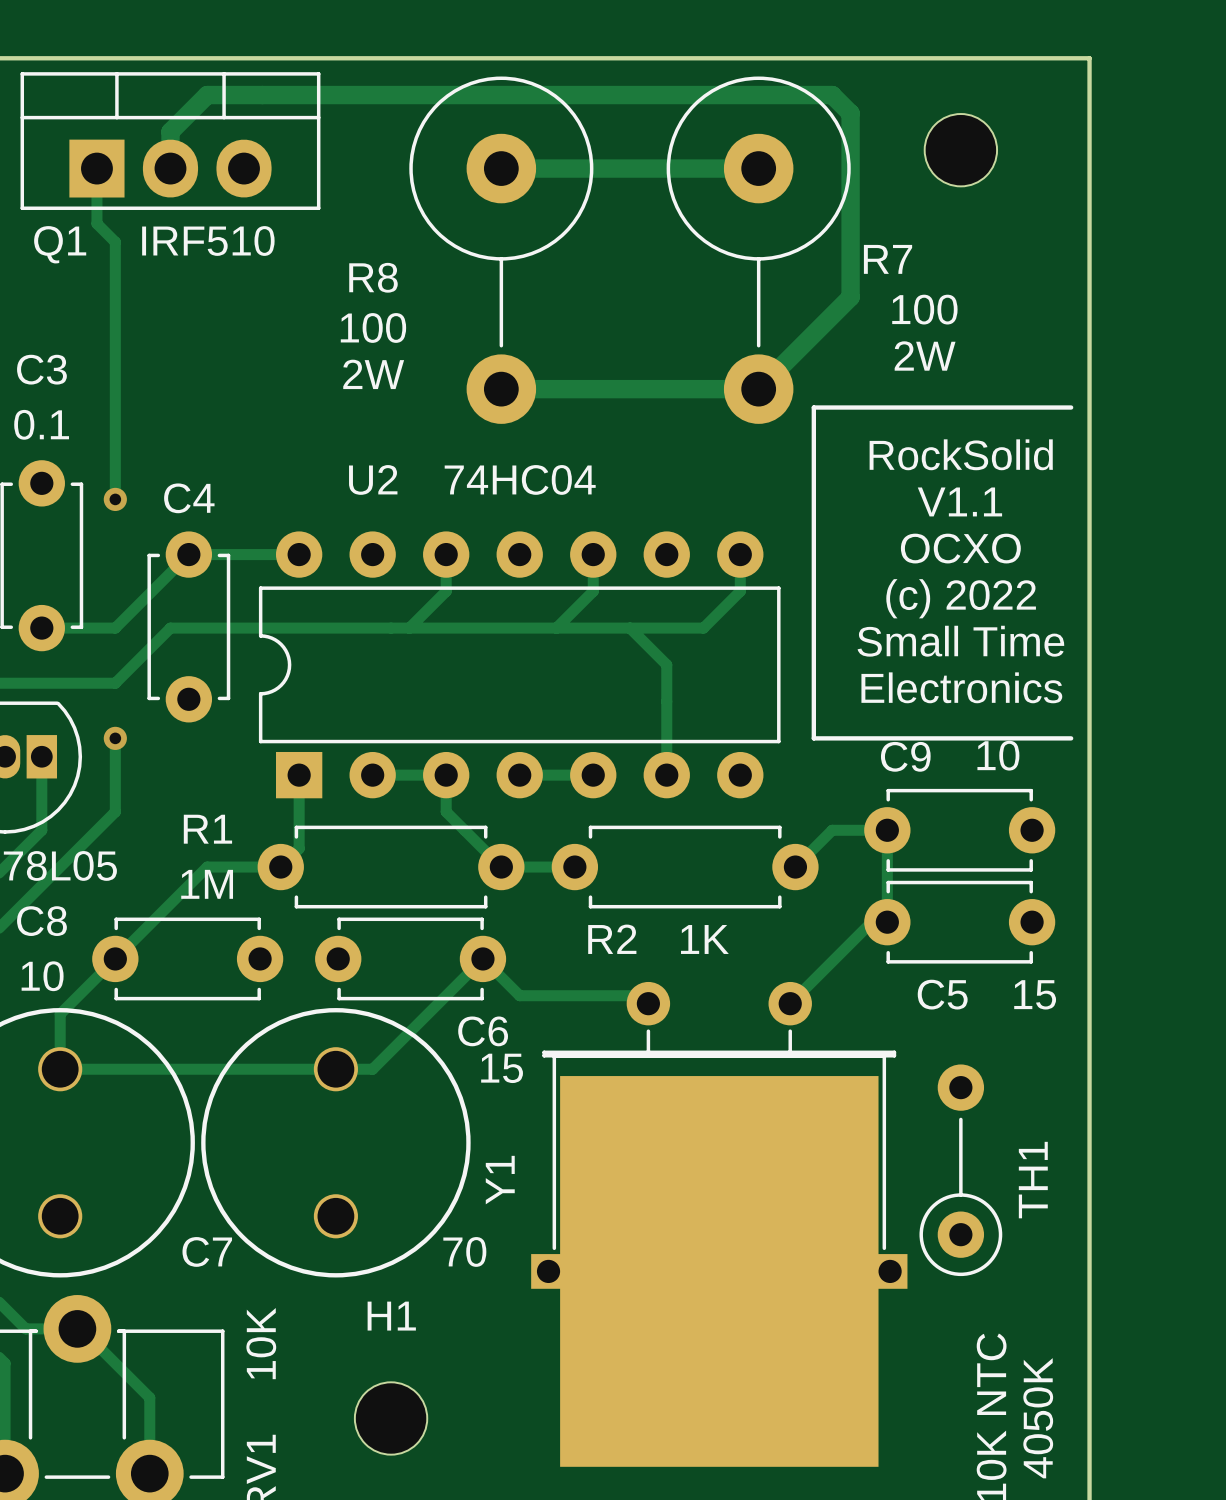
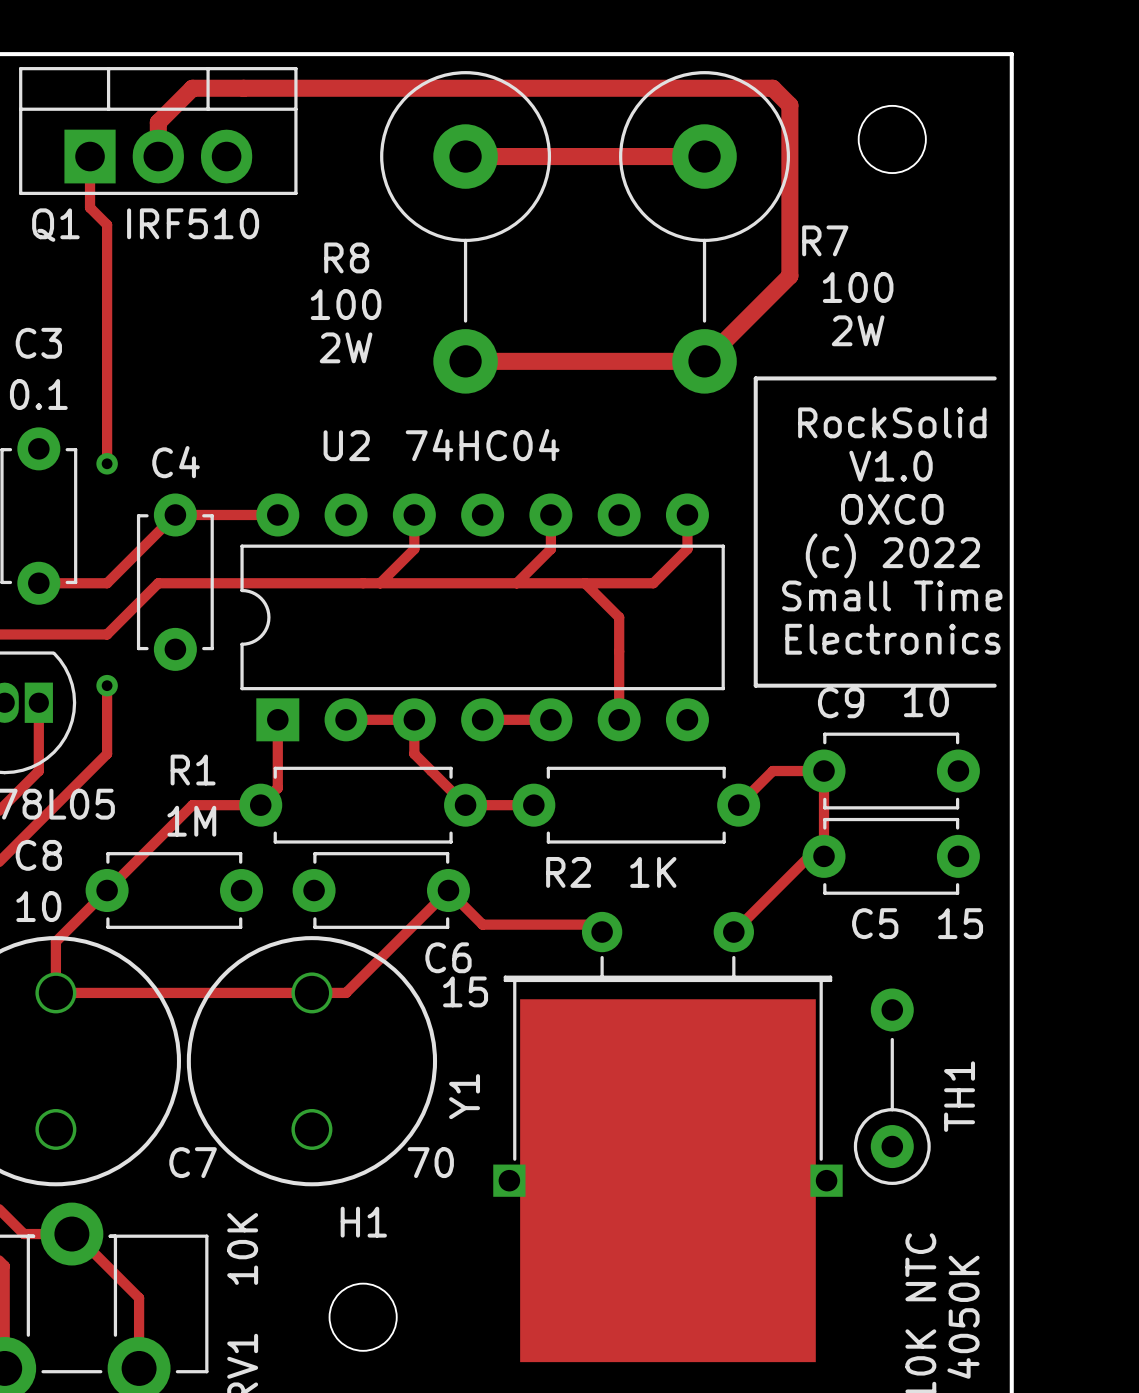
text: V1.1 (959, 501) -> V1.0 (891, 466)
text: OCXO (960, 548) -> OXCO (892, 509)

